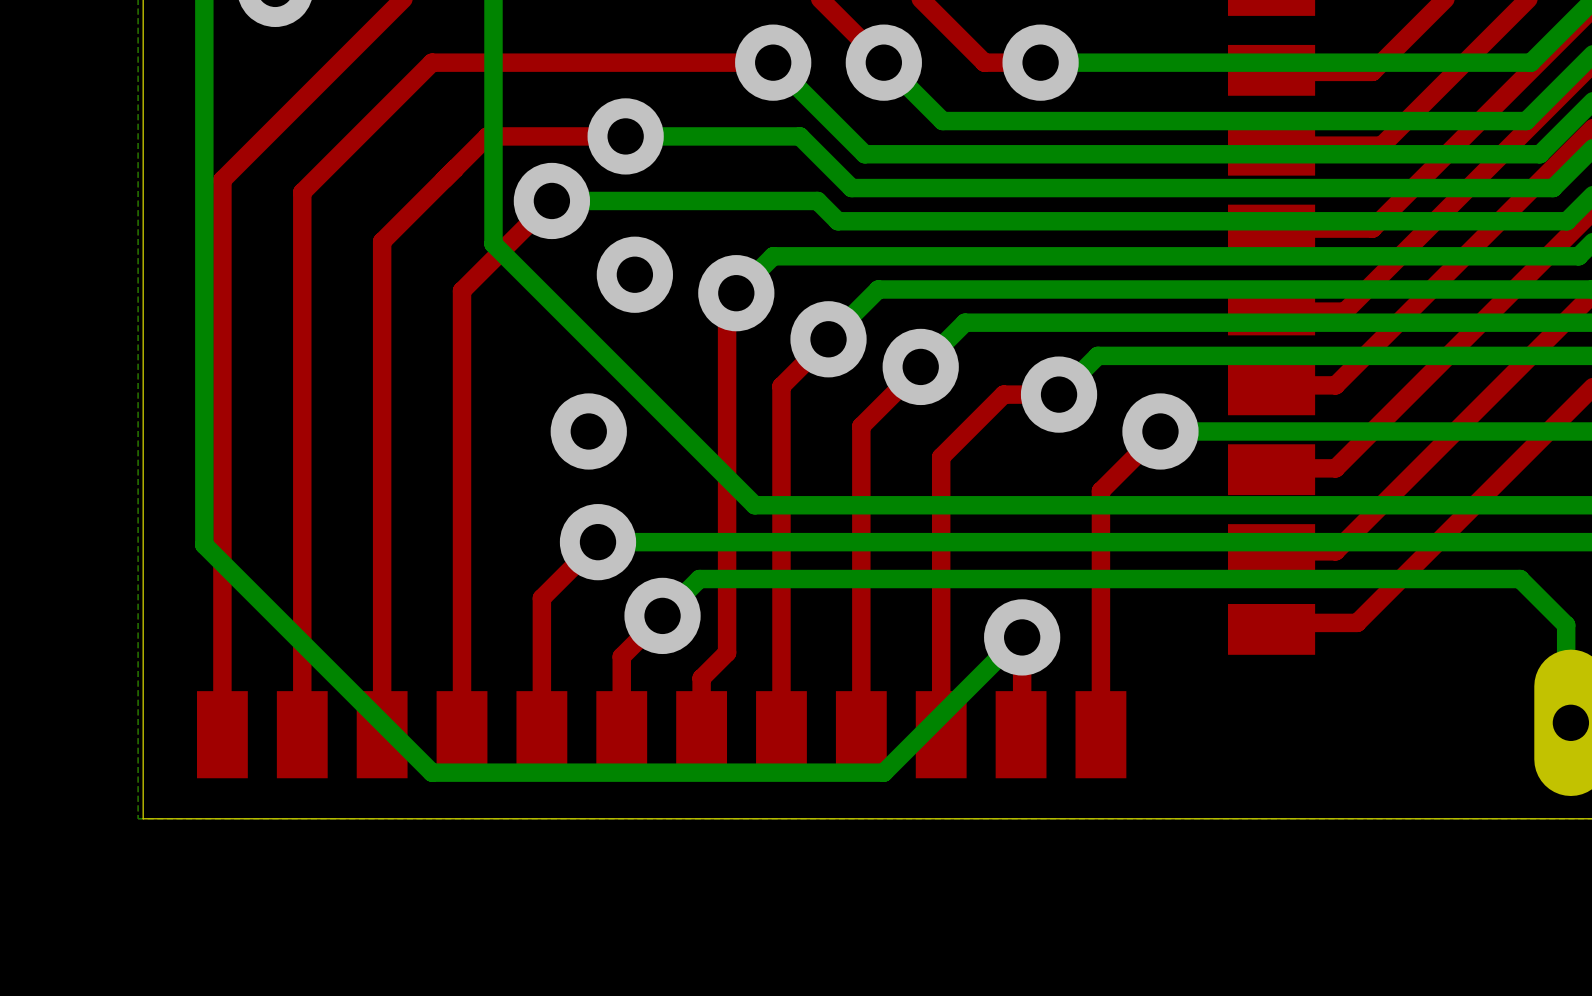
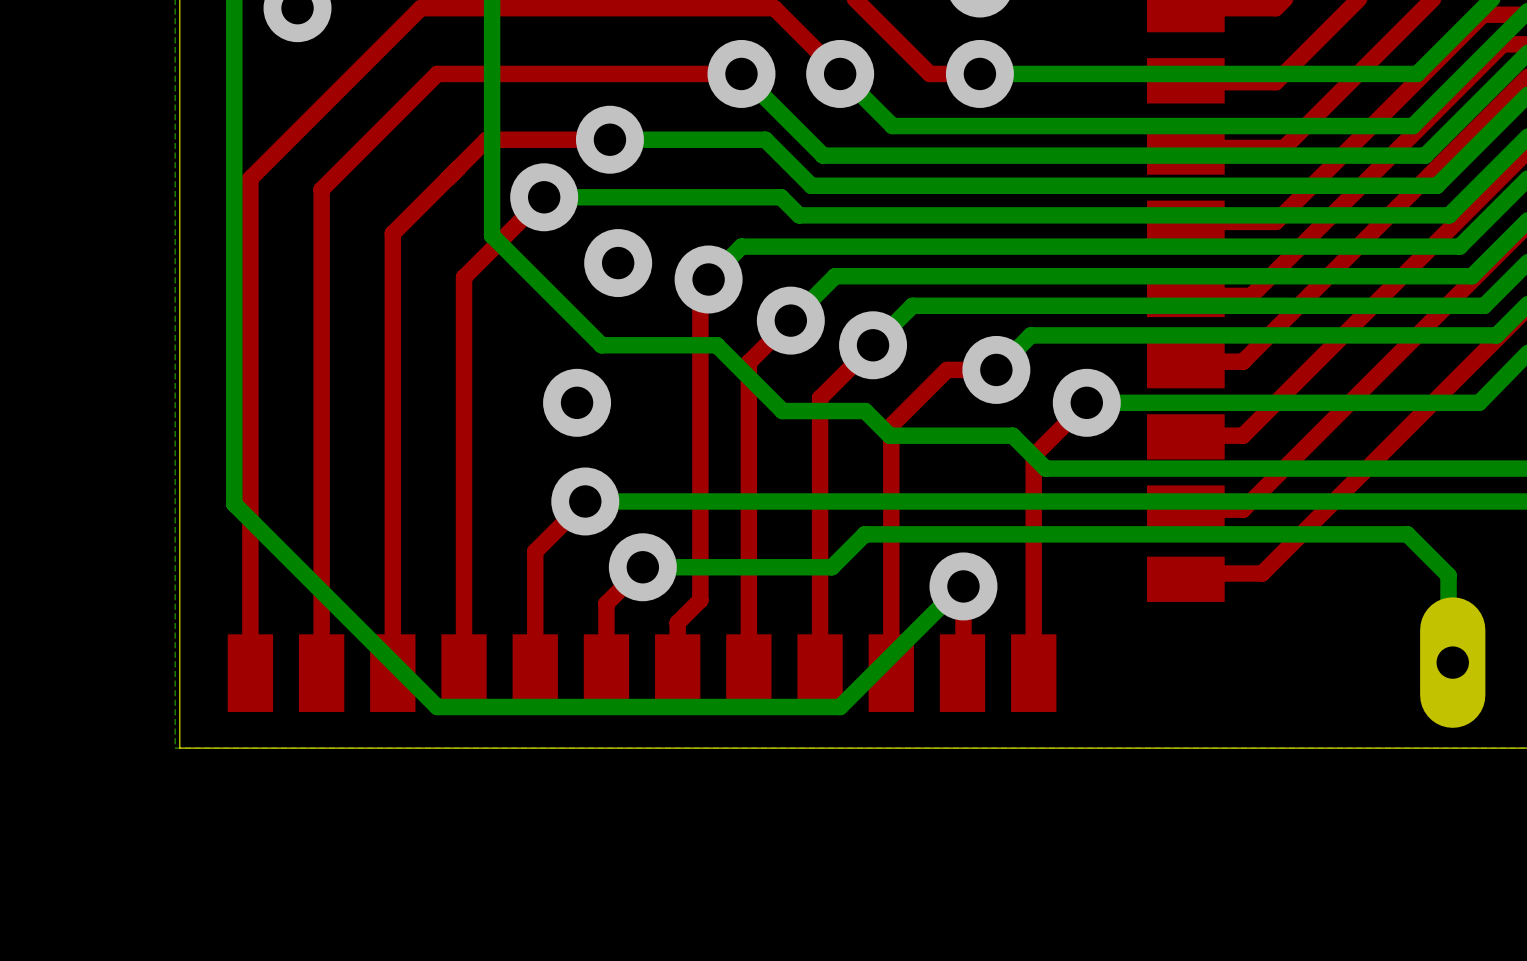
bottom track: (616, 366) (754, 505) (1114, 505) -> (601, 345) (716, 345) (782, 411) (865, 411) (889, 435) (1012, 435) (1045, 468)
bottom track: (911, 579) (699, 579) (662, 615) -> (864, 534) (831, 567) (642, 567)

